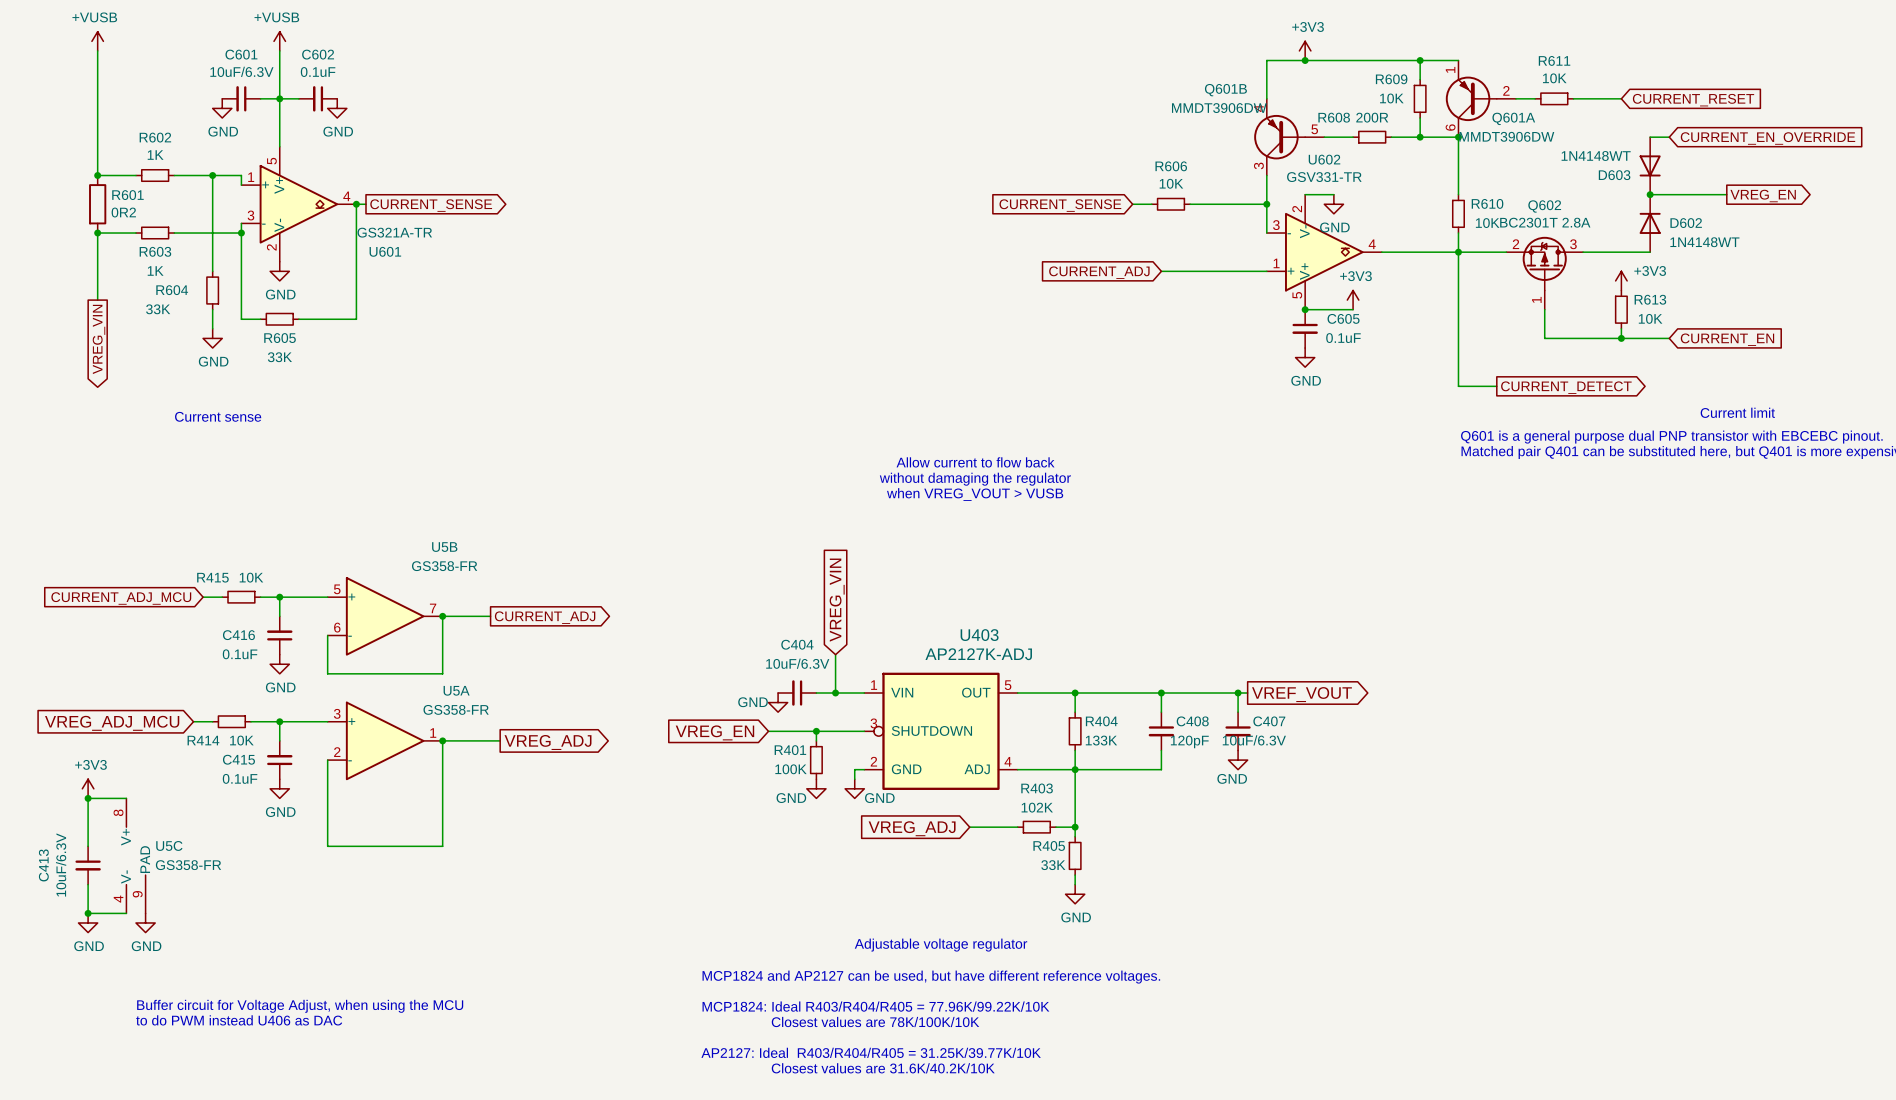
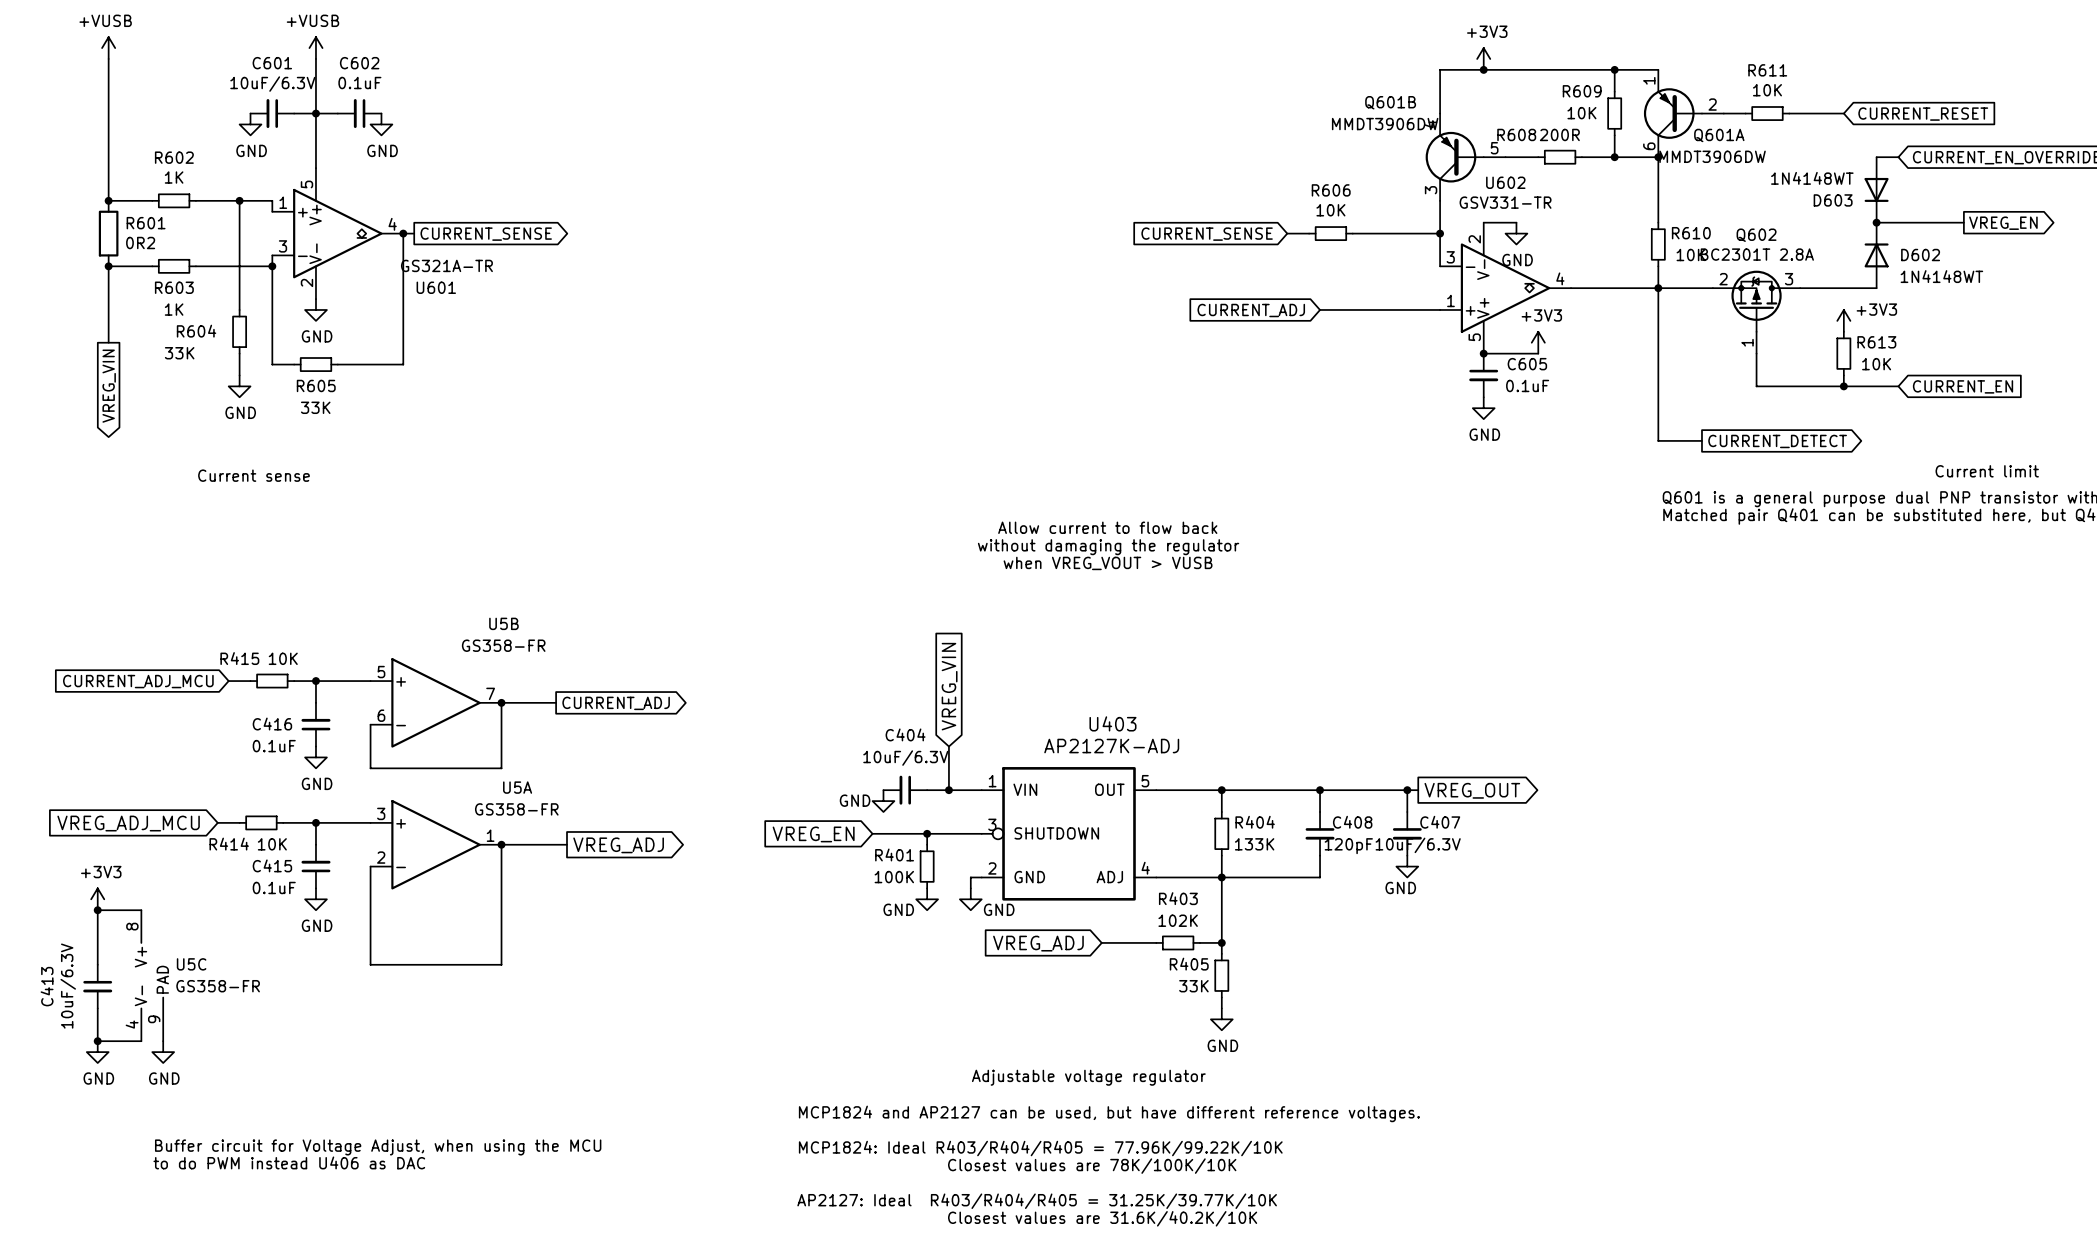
global label: VREF_VOUT (1301, 694) -> VREG_OUT (1472, 790)

